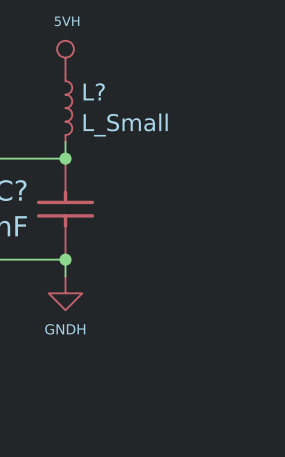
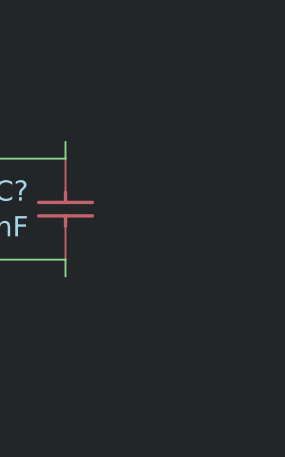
power symbol: 5VH (65, 57) -> none
L?: L_Small (68, 108) -> none
junction: (65, 158) -> none
junction: (65, 259) -> none
power symbol: GNDH (65, 293) -> none

